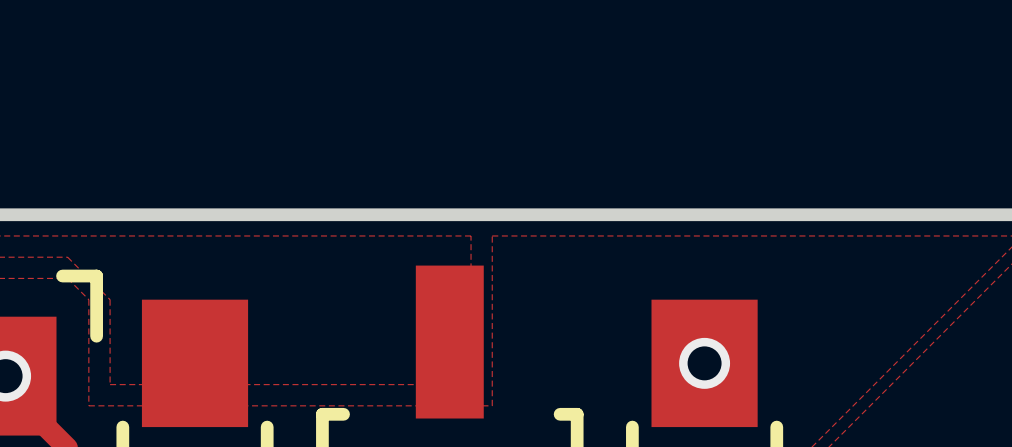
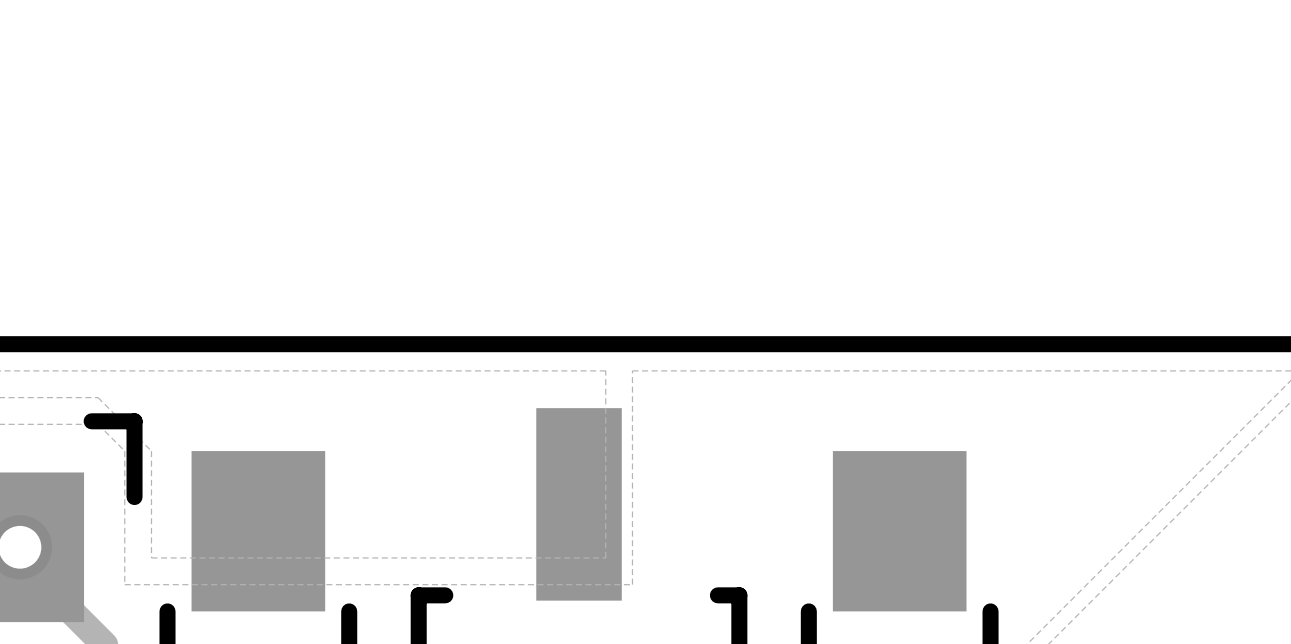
via: (704, 363) -> none

